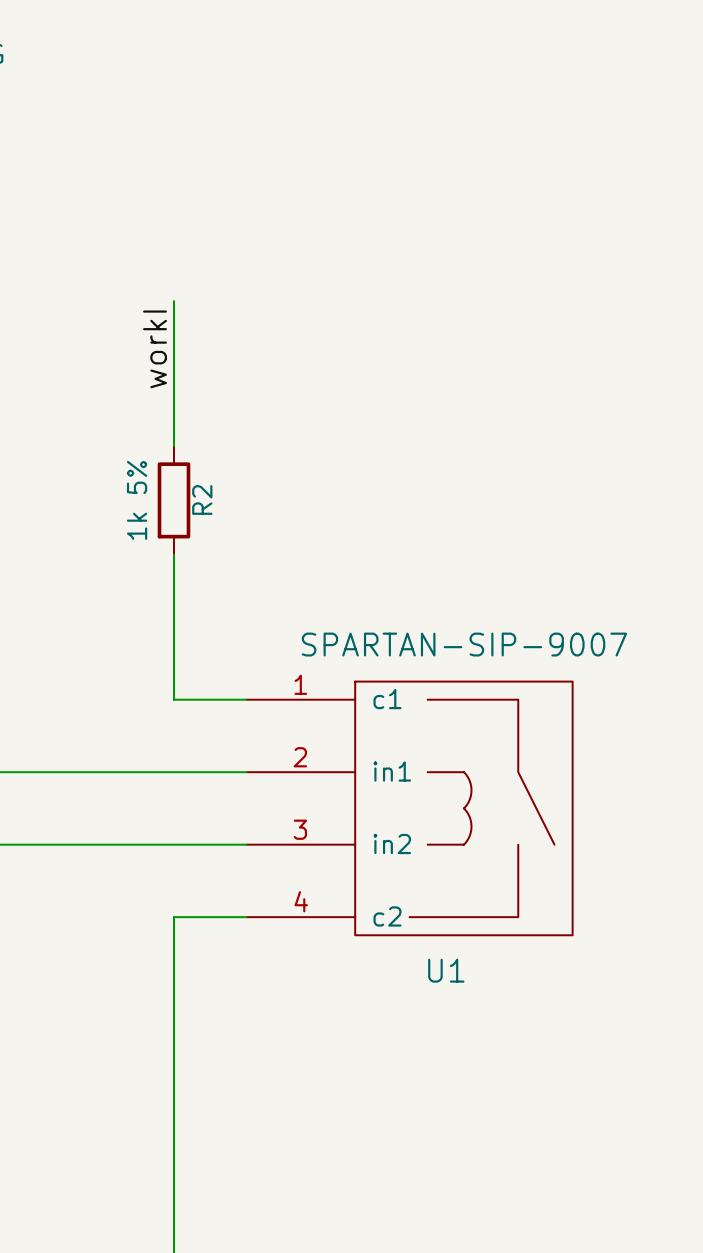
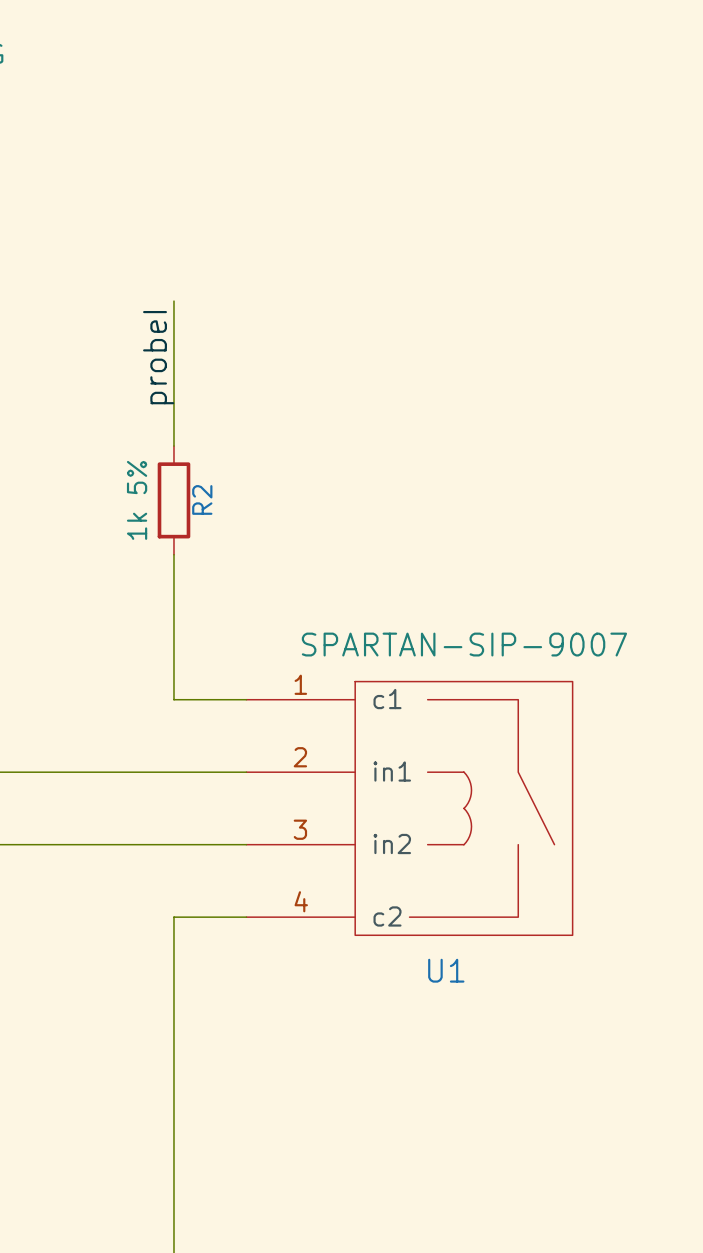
label: workI (155, 349) -> none
label: none -> probeI (158, 357)

